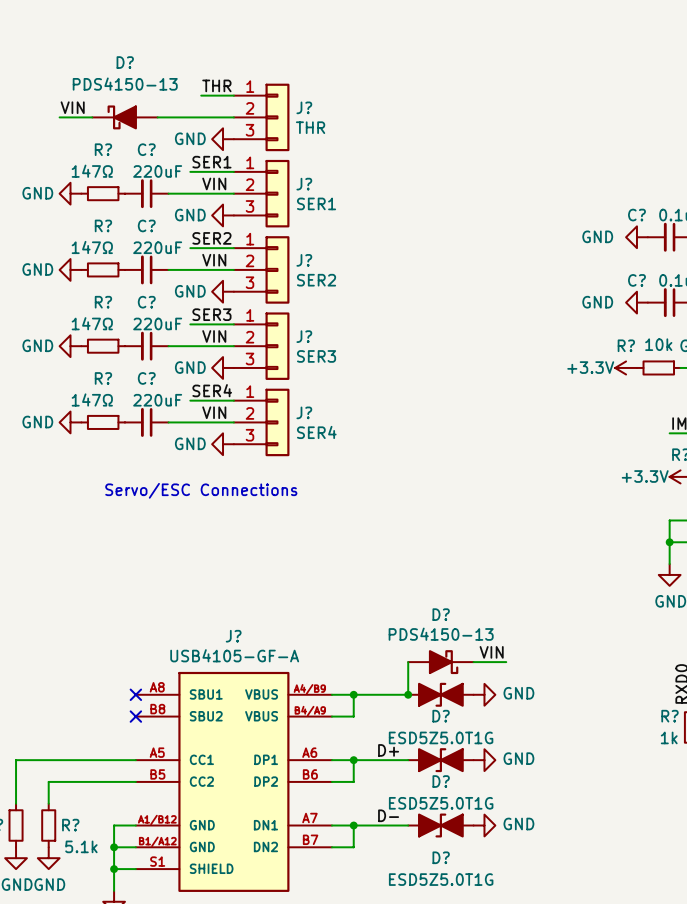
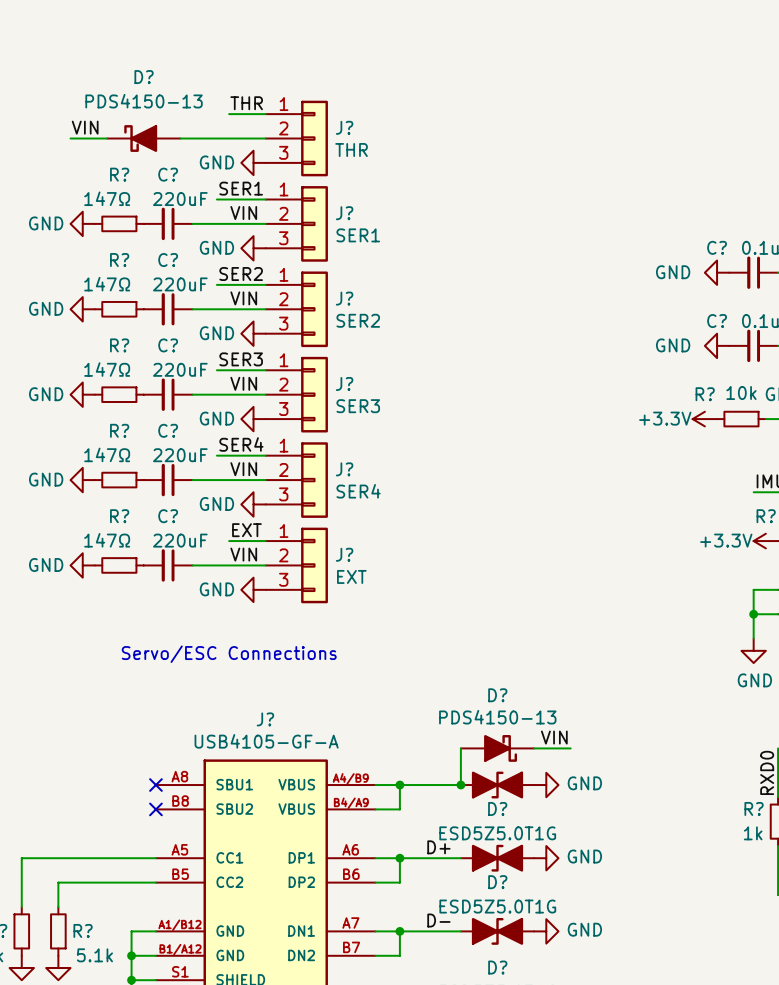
label: none -> EXT (246, 530)
wire: none -> (229, 541) (265, 541)
label: none -> VIN (243, 554)
text position: Servo/ESC Connections (201, 490) -> Servo/ESC Connections (229, 654)
power symbol: none -> GND (82, 565)
R?: none -> 147Ω (119, 565)
C?: none -> 220uF (168, 565)
wire: none -> (192, 565) (265, 565)
J?: none -> EXT (296, 565)
power symbol: none -> GND (253, 589)

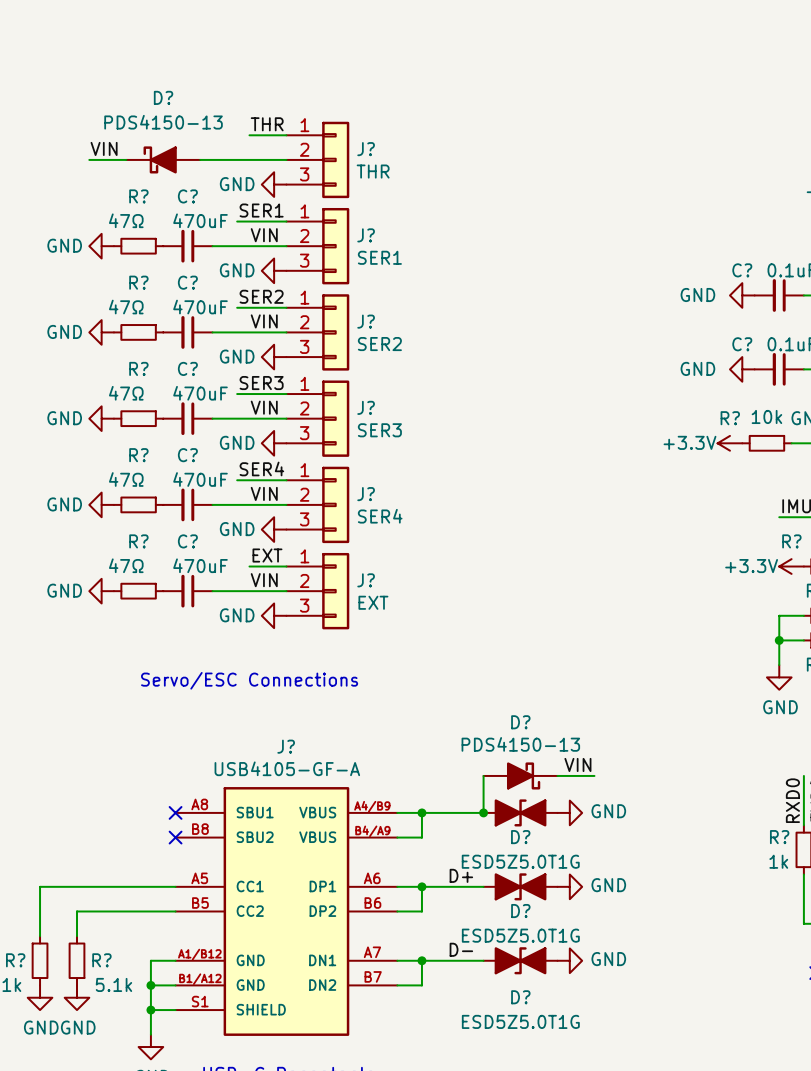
R? value: 147Ω (107, 198) -> 47Ω (126, 220)
C? value: 220uF (180, 199) -> 470uF (200, 220)
R? value: 147Ω (107, 284) -> 47Ω (126, 307)
C? value: 220uF (180, 284) -> 470uF (200, 307)
R? value: 147Ω (107, 369) -> 47Ω (126, 393)
C? value: 220uF (180, 369) -> 470uF (200, 393)
R? value: 147Ω (107, 454) -> 47Ω (126, 479)
C? value: 220uF (180, 455) -> 470uF (200, 479)
R? value: 147Ω (107, 540) -> 47Ω (126, 565)
C? value: 220uF (180, 540) -> 470uF (200, 565)

